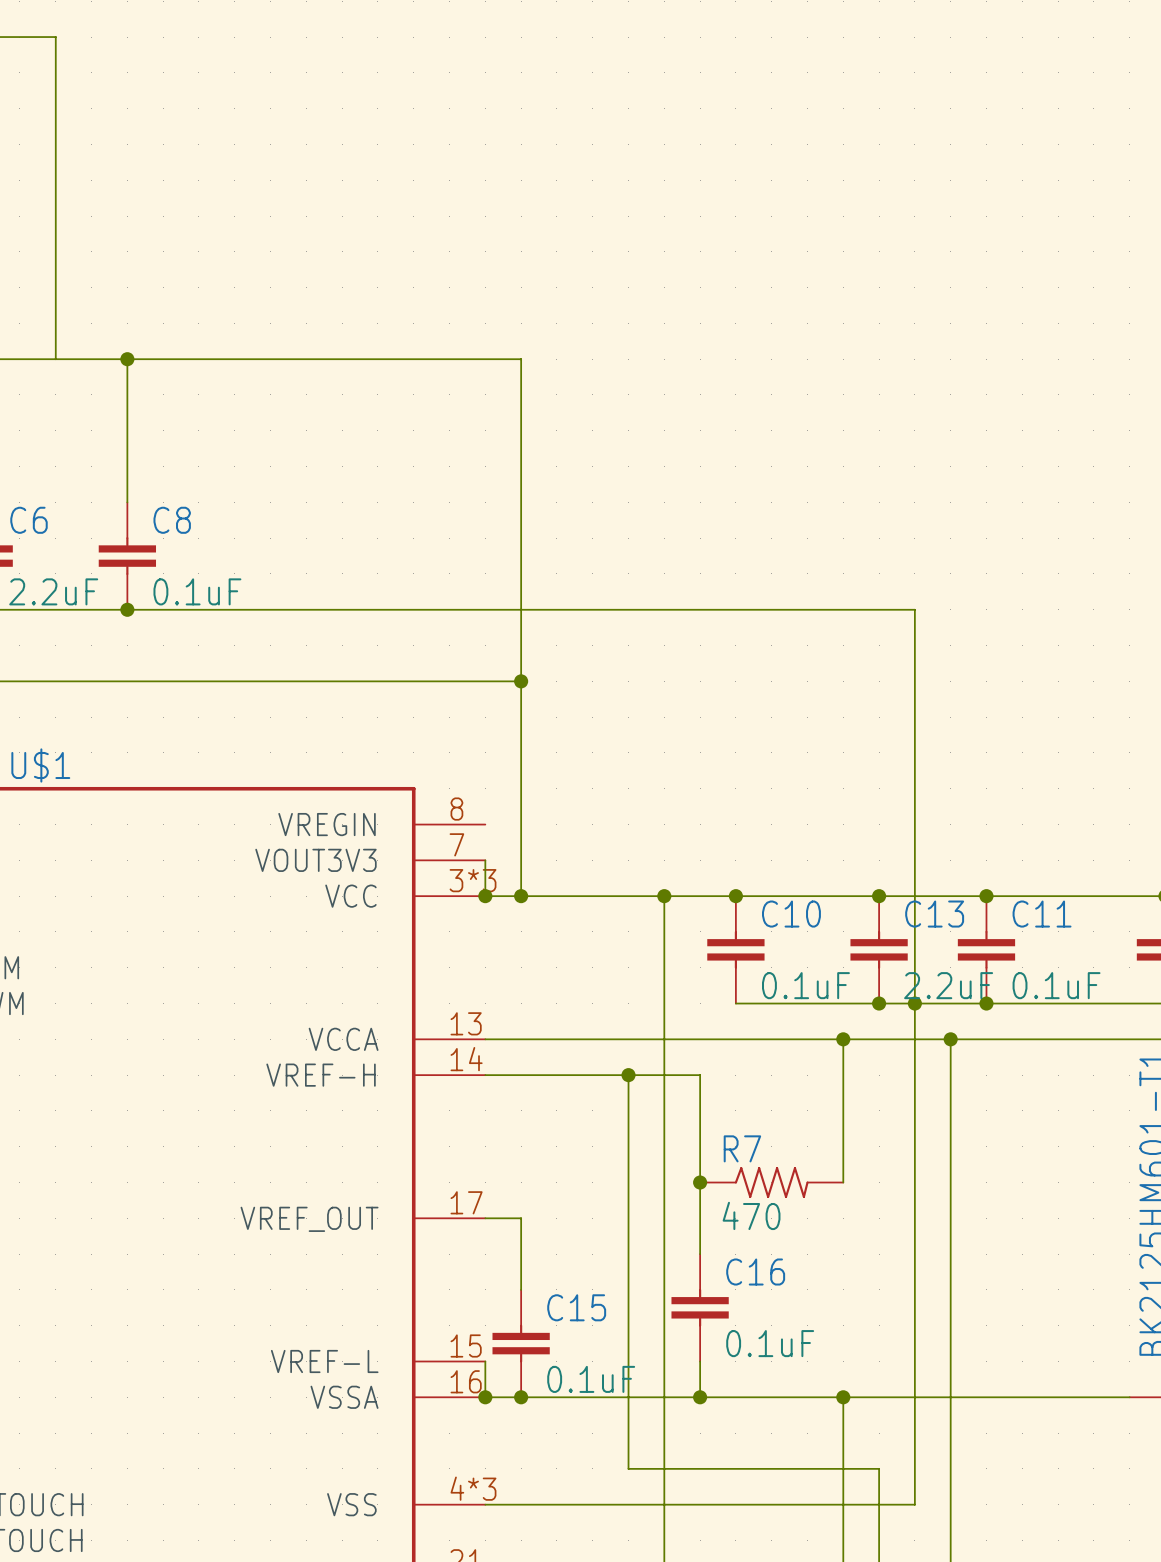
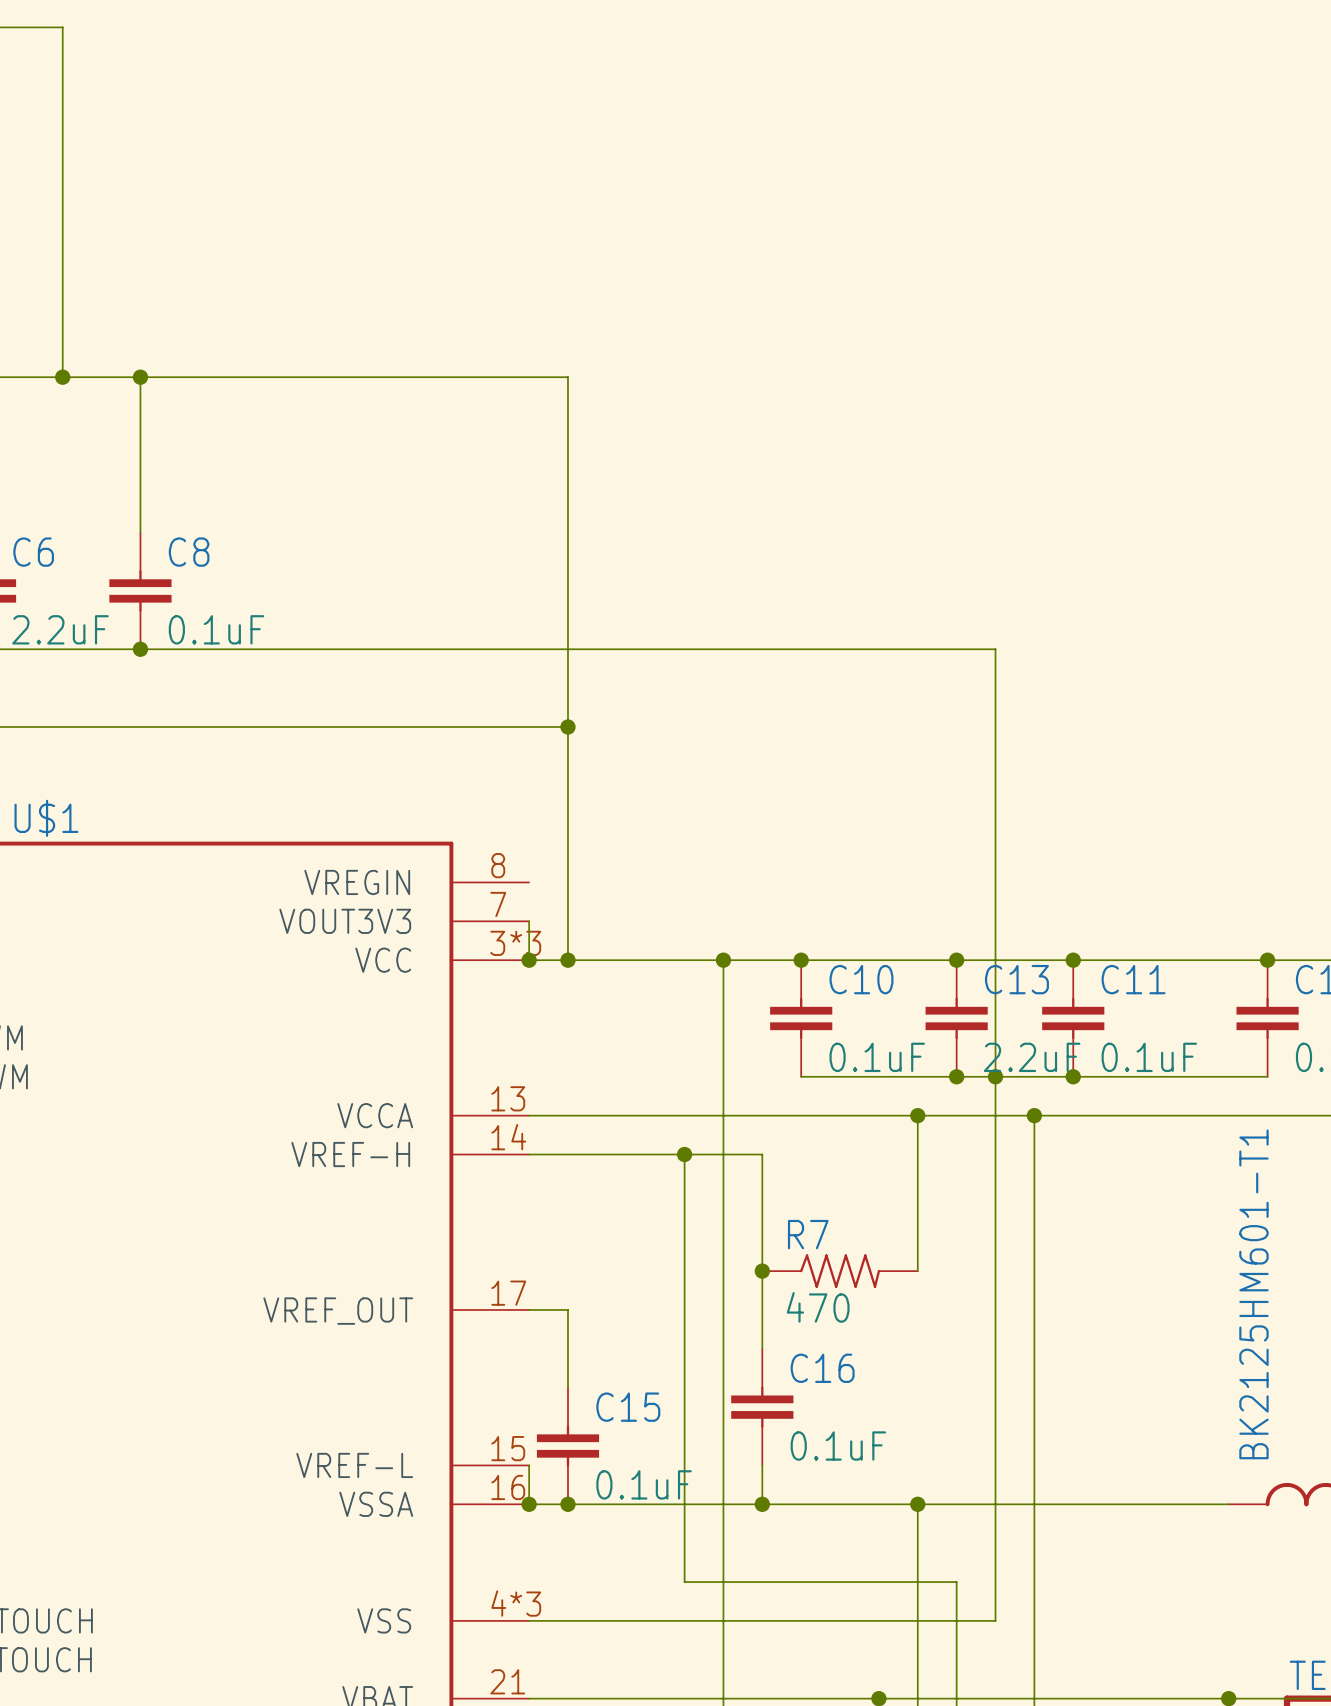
junction: none -> (62, 377)

